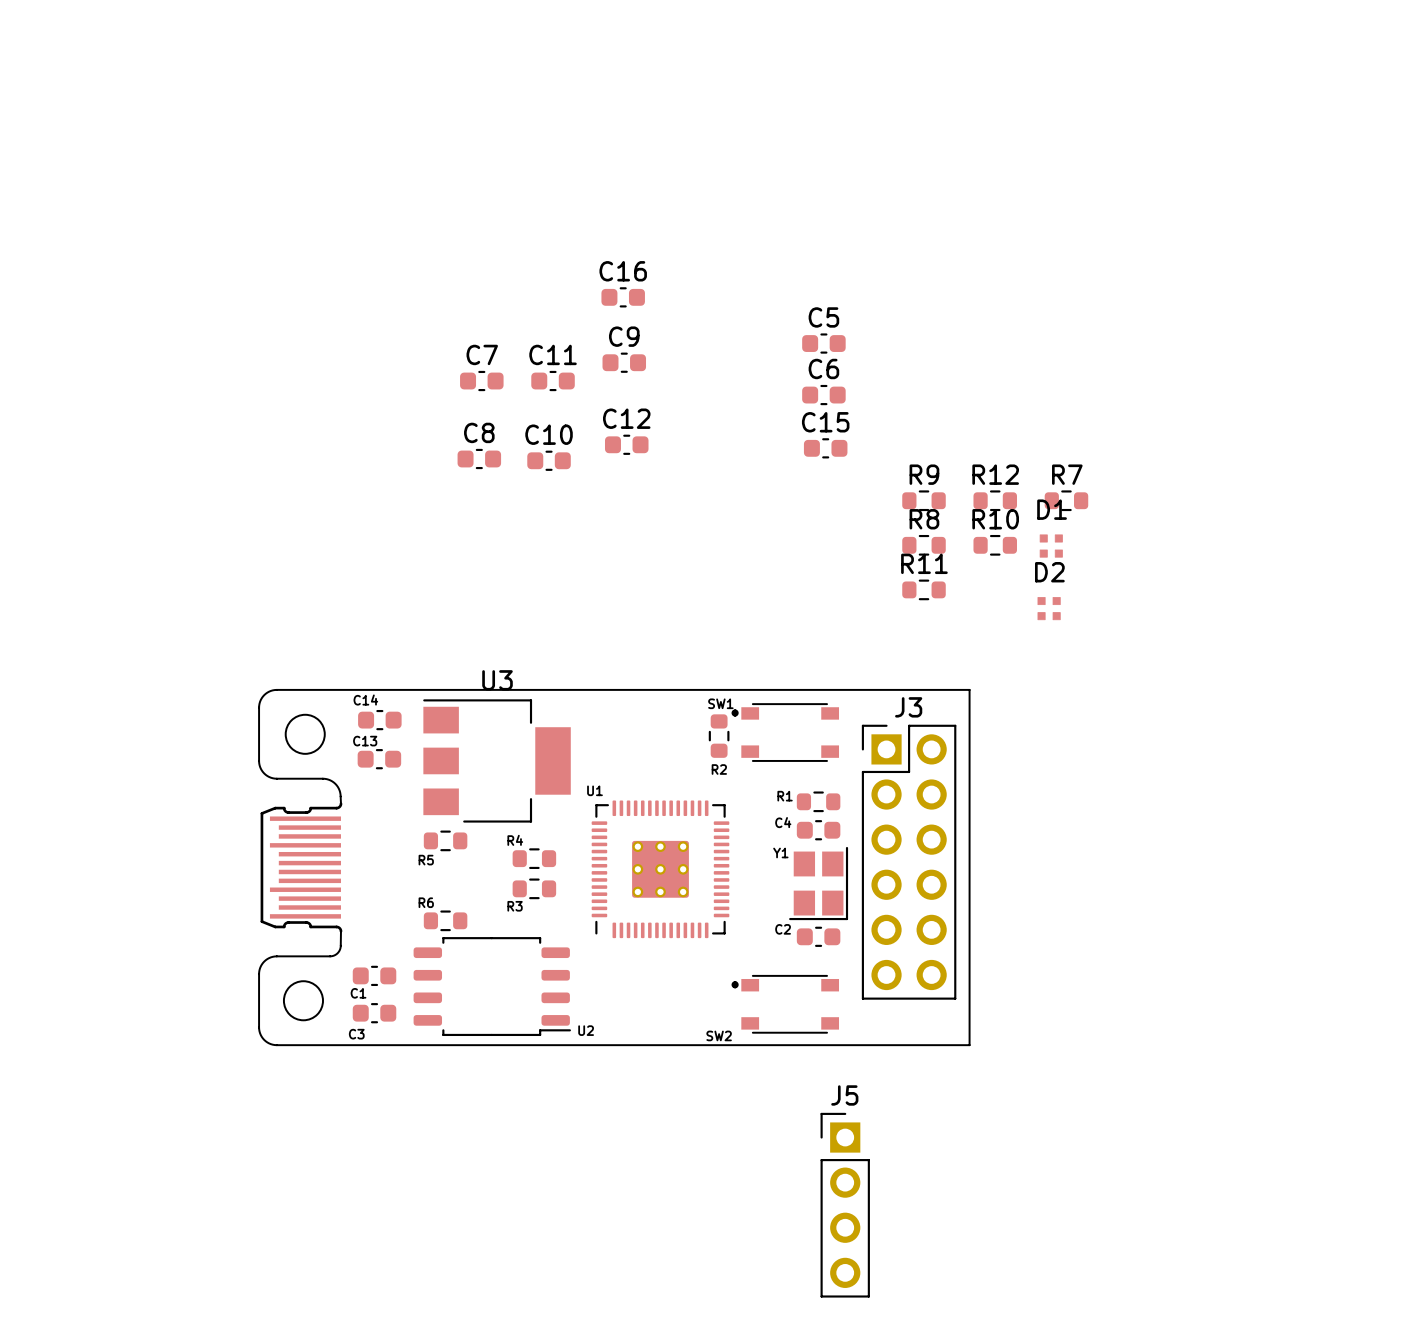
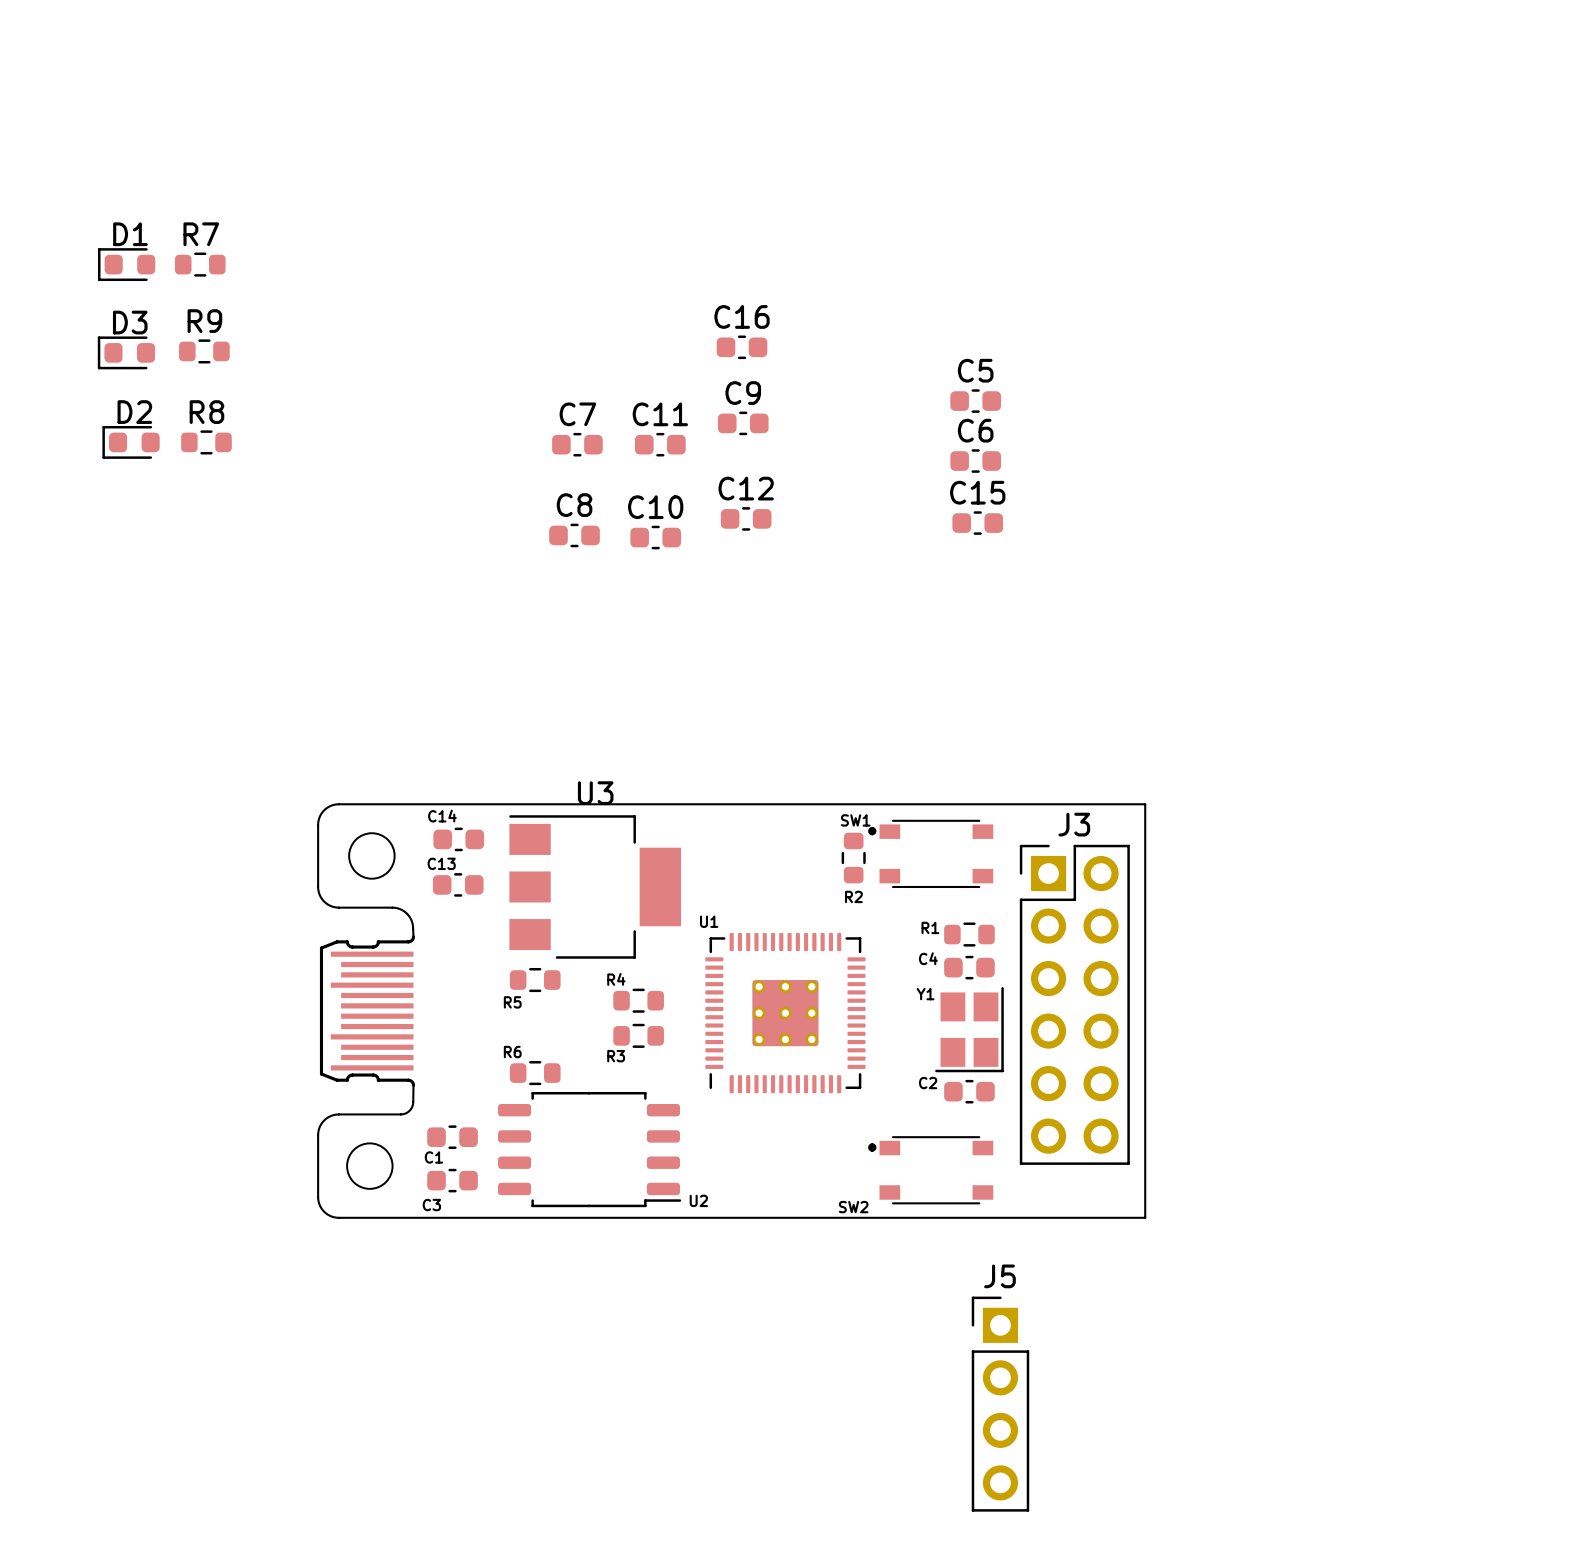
D3: none -> (126, 352)
R9 position: (924, 500) -> (204, 351)
R12: (995, 500) -> none
R7 position: (1066, 500) -> (200, 264)
D1 footprint: [1039, 531, 1066, 558] -> [98, 248, 156, 282]
R8 position: (924, 545) -> (206, 442)
R10: (995, 545) -> none
R11: (924, 589) -> none
D2 footprint: [1037, 594, 1064, 621] -> [102, 425, 160, 459]

